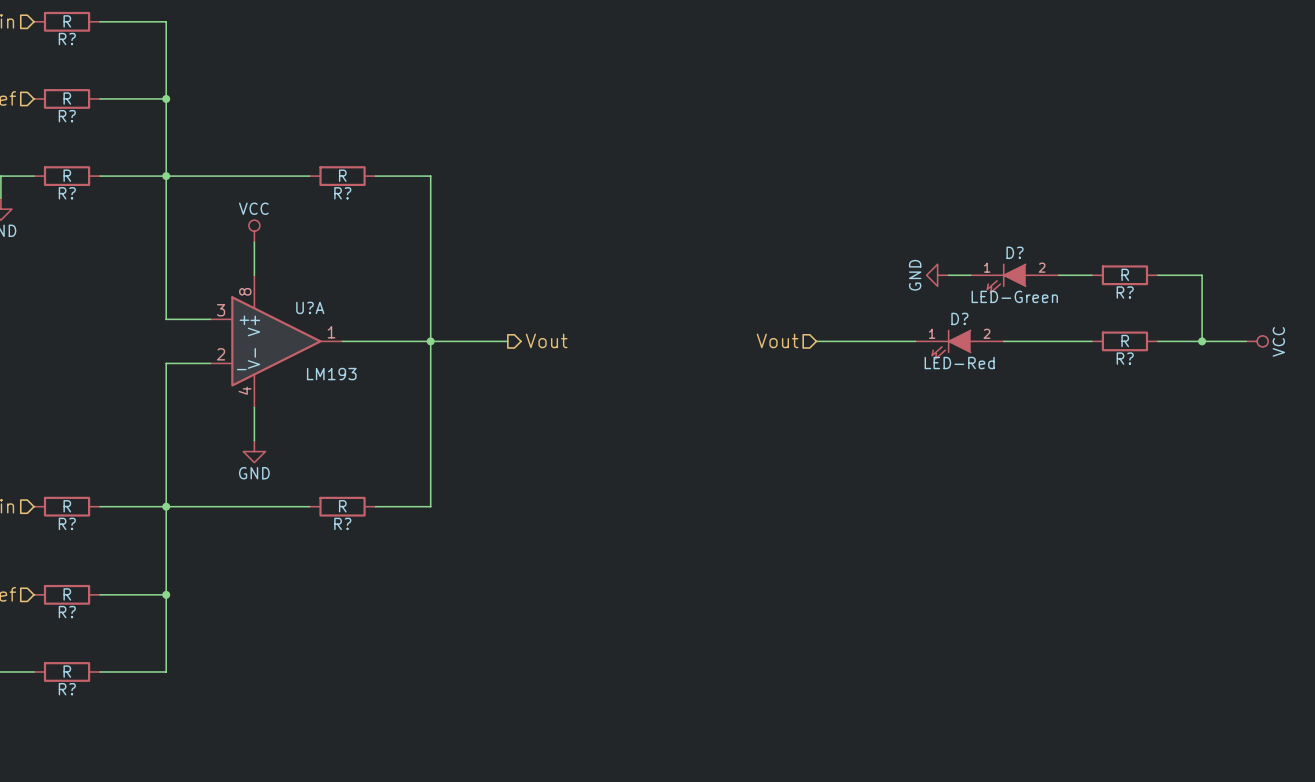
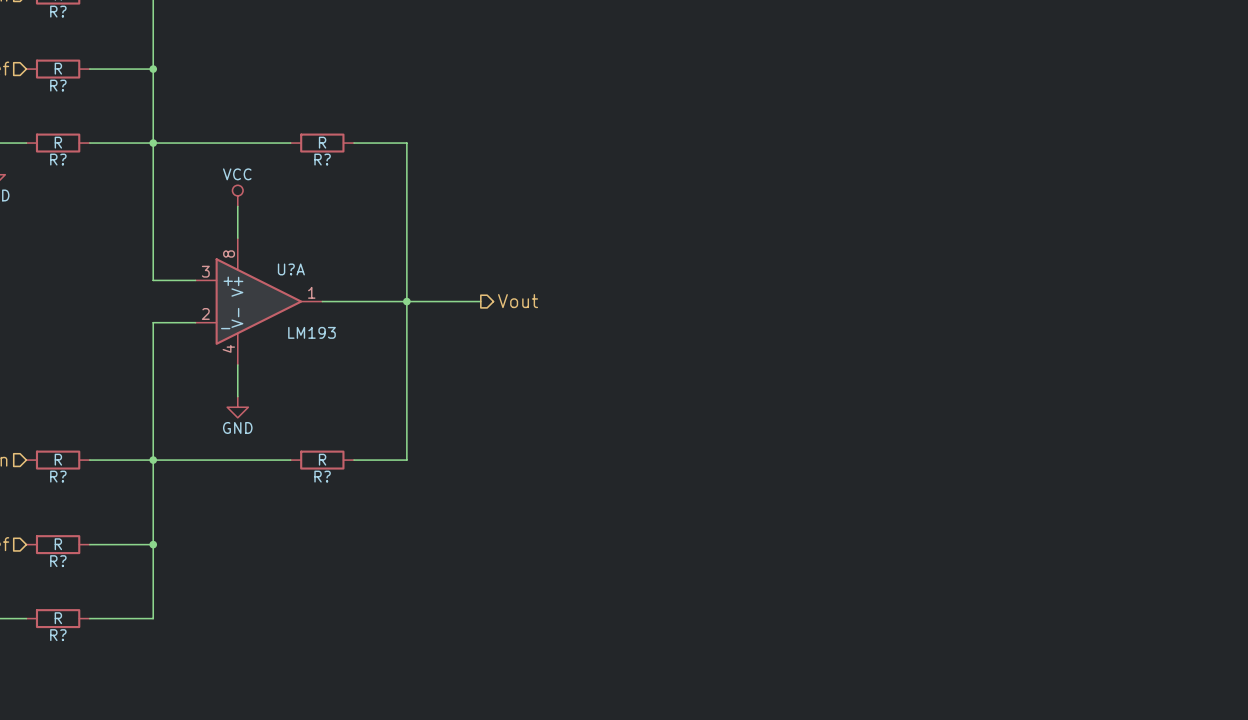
power symbol: GND (937, 275) -> none
wire: (948, 275) (970, 275) -> none
wire: (1058, 275) (1091, 275) -> none
R?: R (1124, 275) -> none
wire: (1158, 275) (1202, 275) (1202, 341) -> none
D?: LED-Green (1014, 278) -> none
hierarchical label: Vout (777, 340) -> none
wire: (816, 341) (915, 341) -> none
wire: (1003, 341) (1091, 341) -> none
R?: R (1124, 341) -> none
wire: (1158, 341) (1246, 341) -> none
junction: (1202, 341) -> none
power symbol: VCC (1257, 341) -> none
D?: LED-Red (959, 344) -> none

